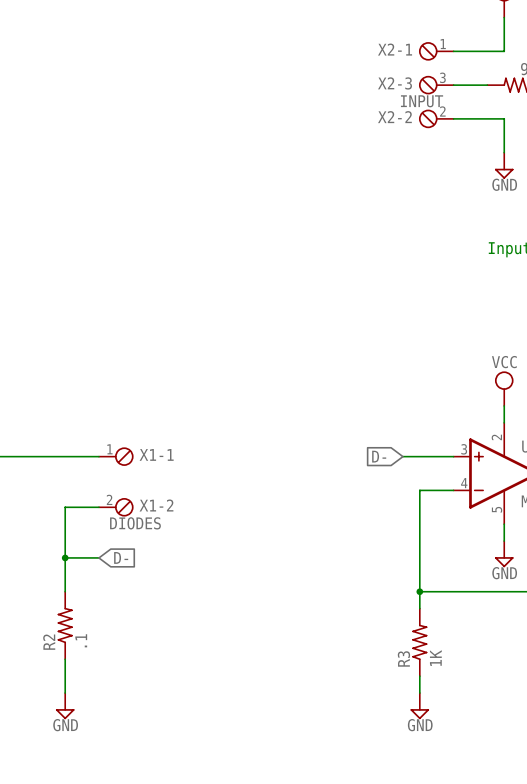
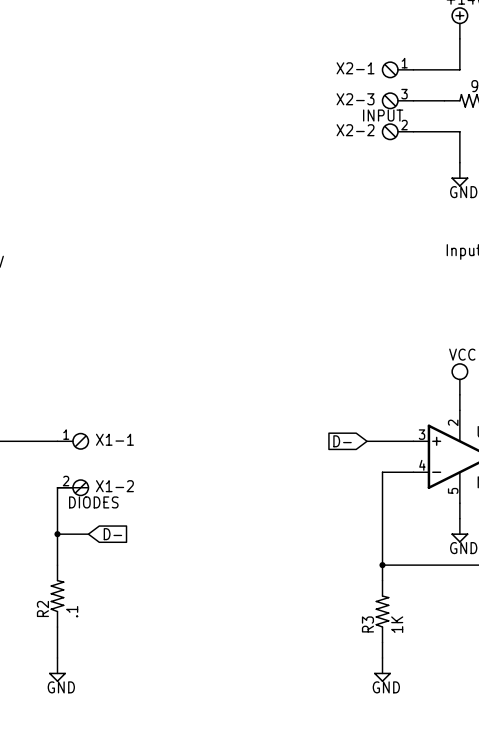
X1-1 position: (116, 456) -> (73, 441)
X1-2 position: (116, 507) -> (73, 487)

